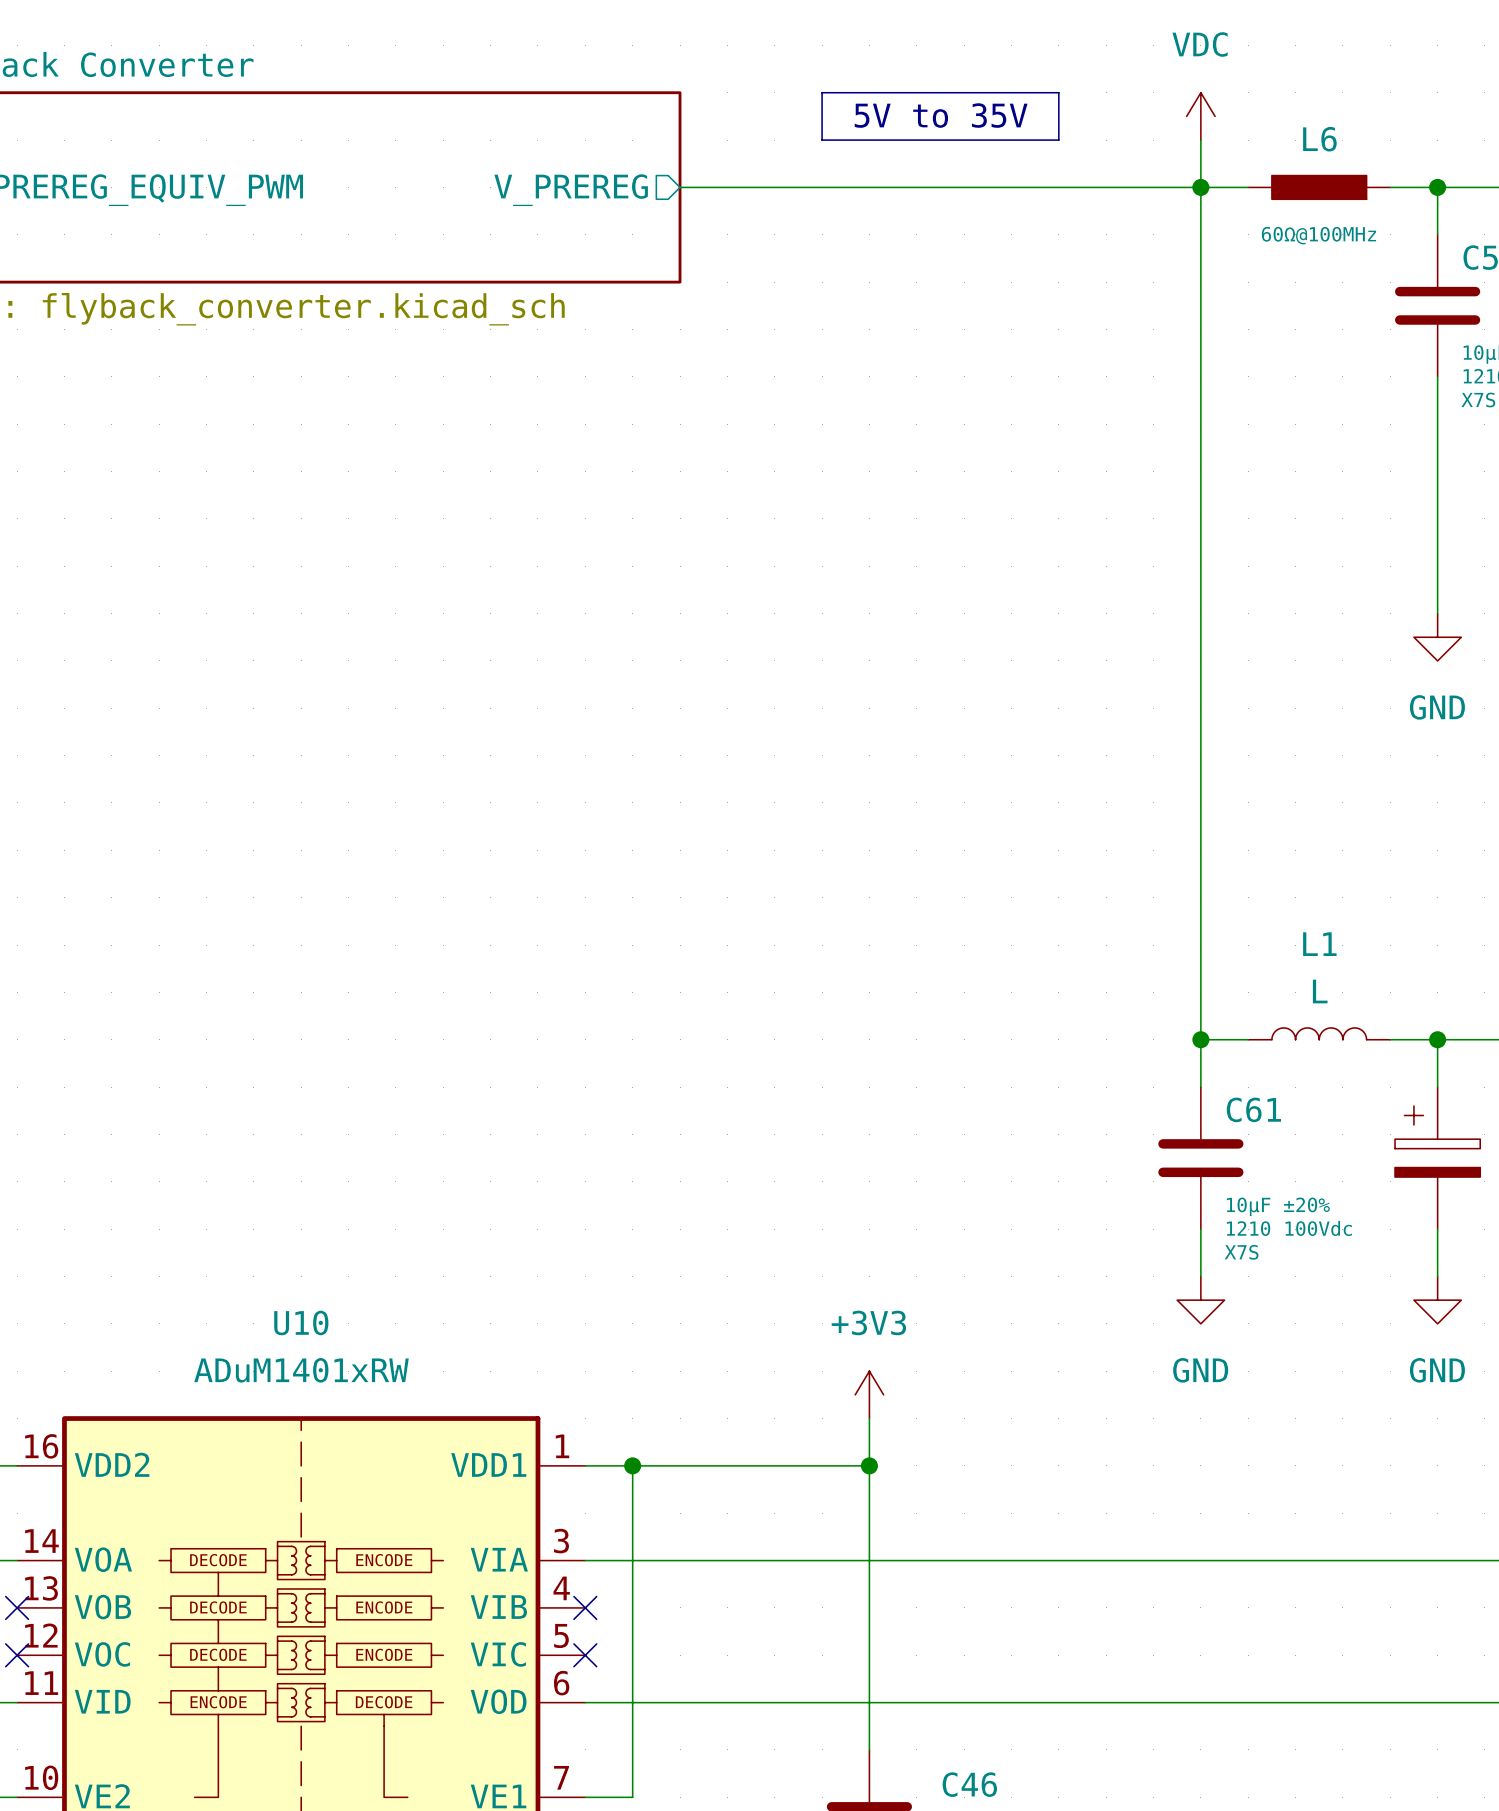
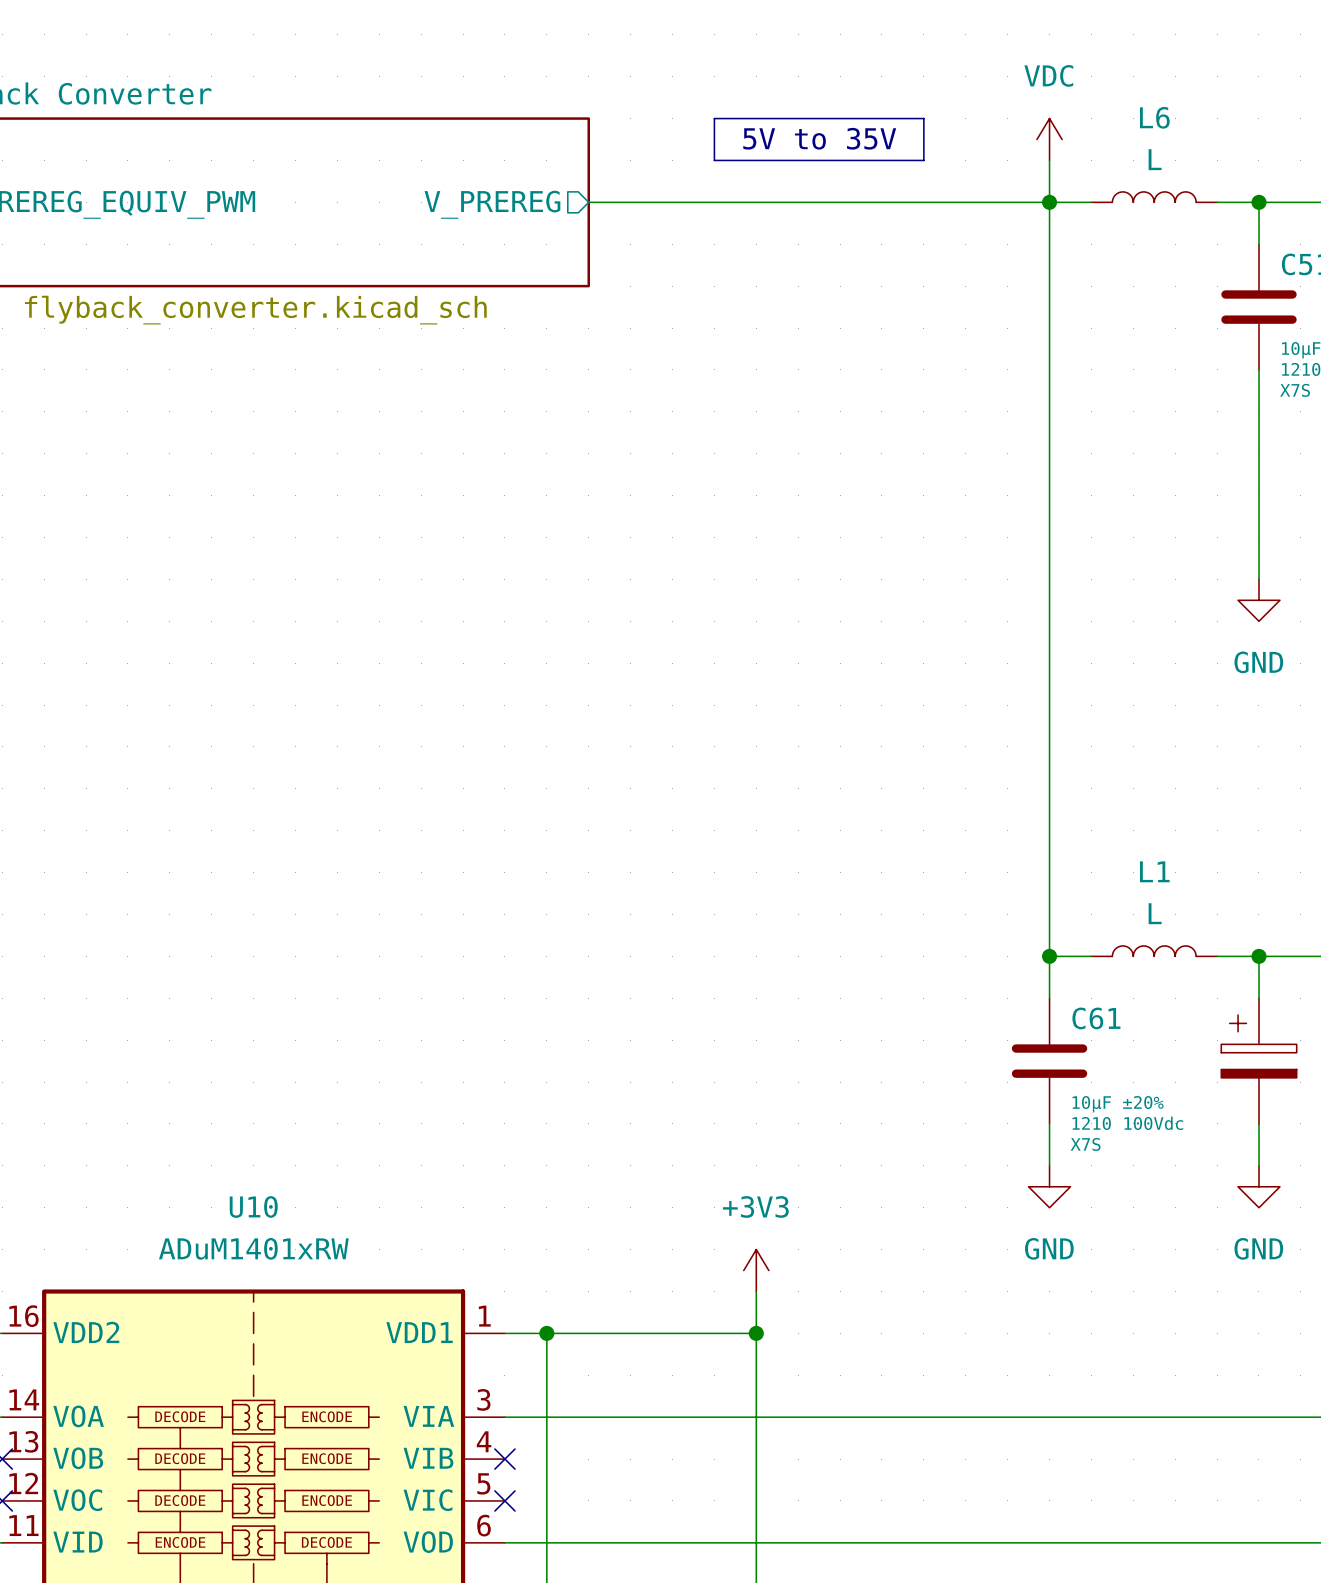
L6 name position: L6 (1319, 139) -> L6 (1154, 117)
L6 symbol: [1248, 175, 1391, 200] -> [1091, 191, 1218, 203]
L6 value: 60Ω@100MHz (1318, 235) -> L (1155, 159)

